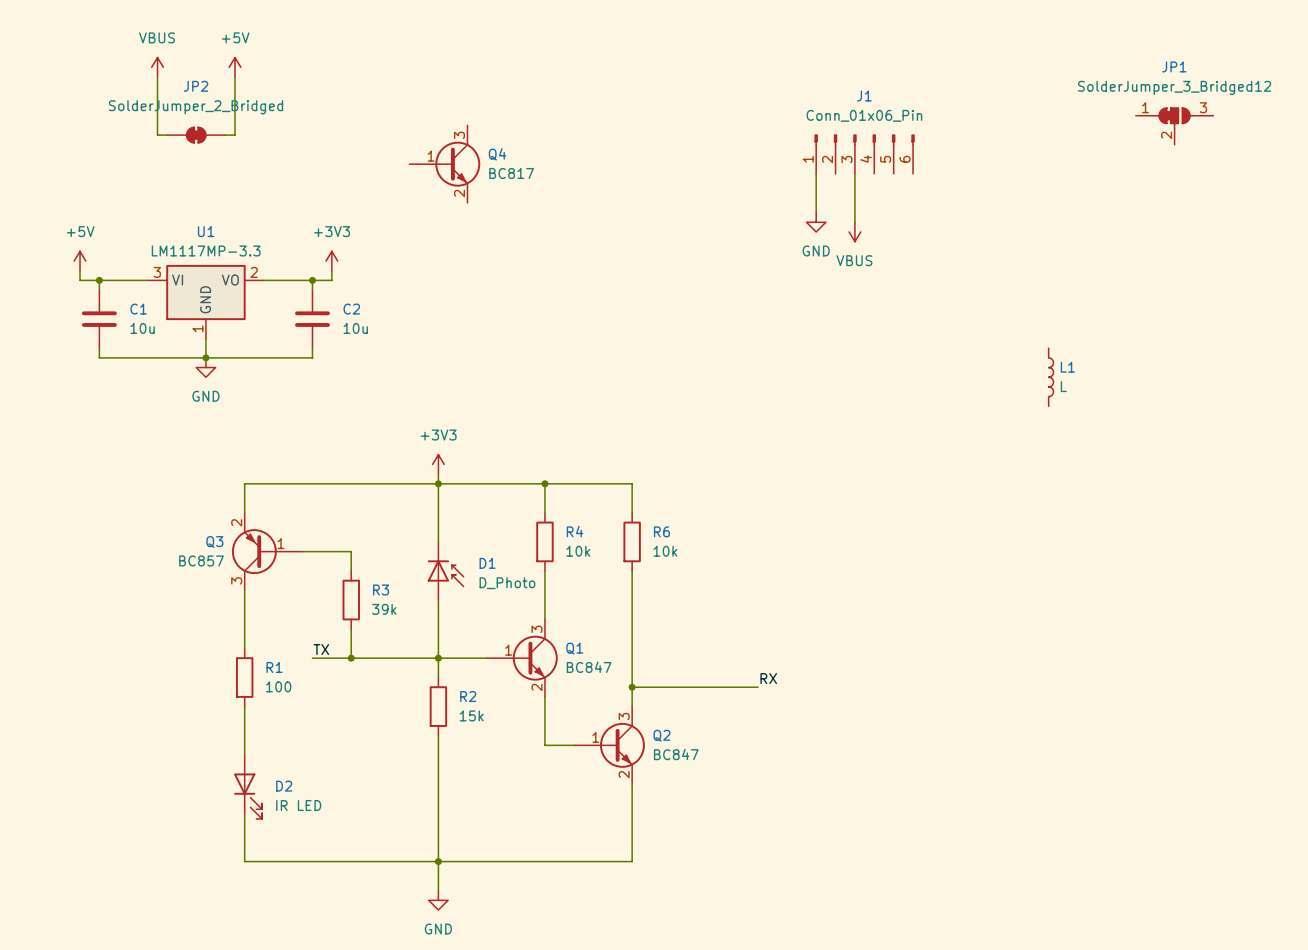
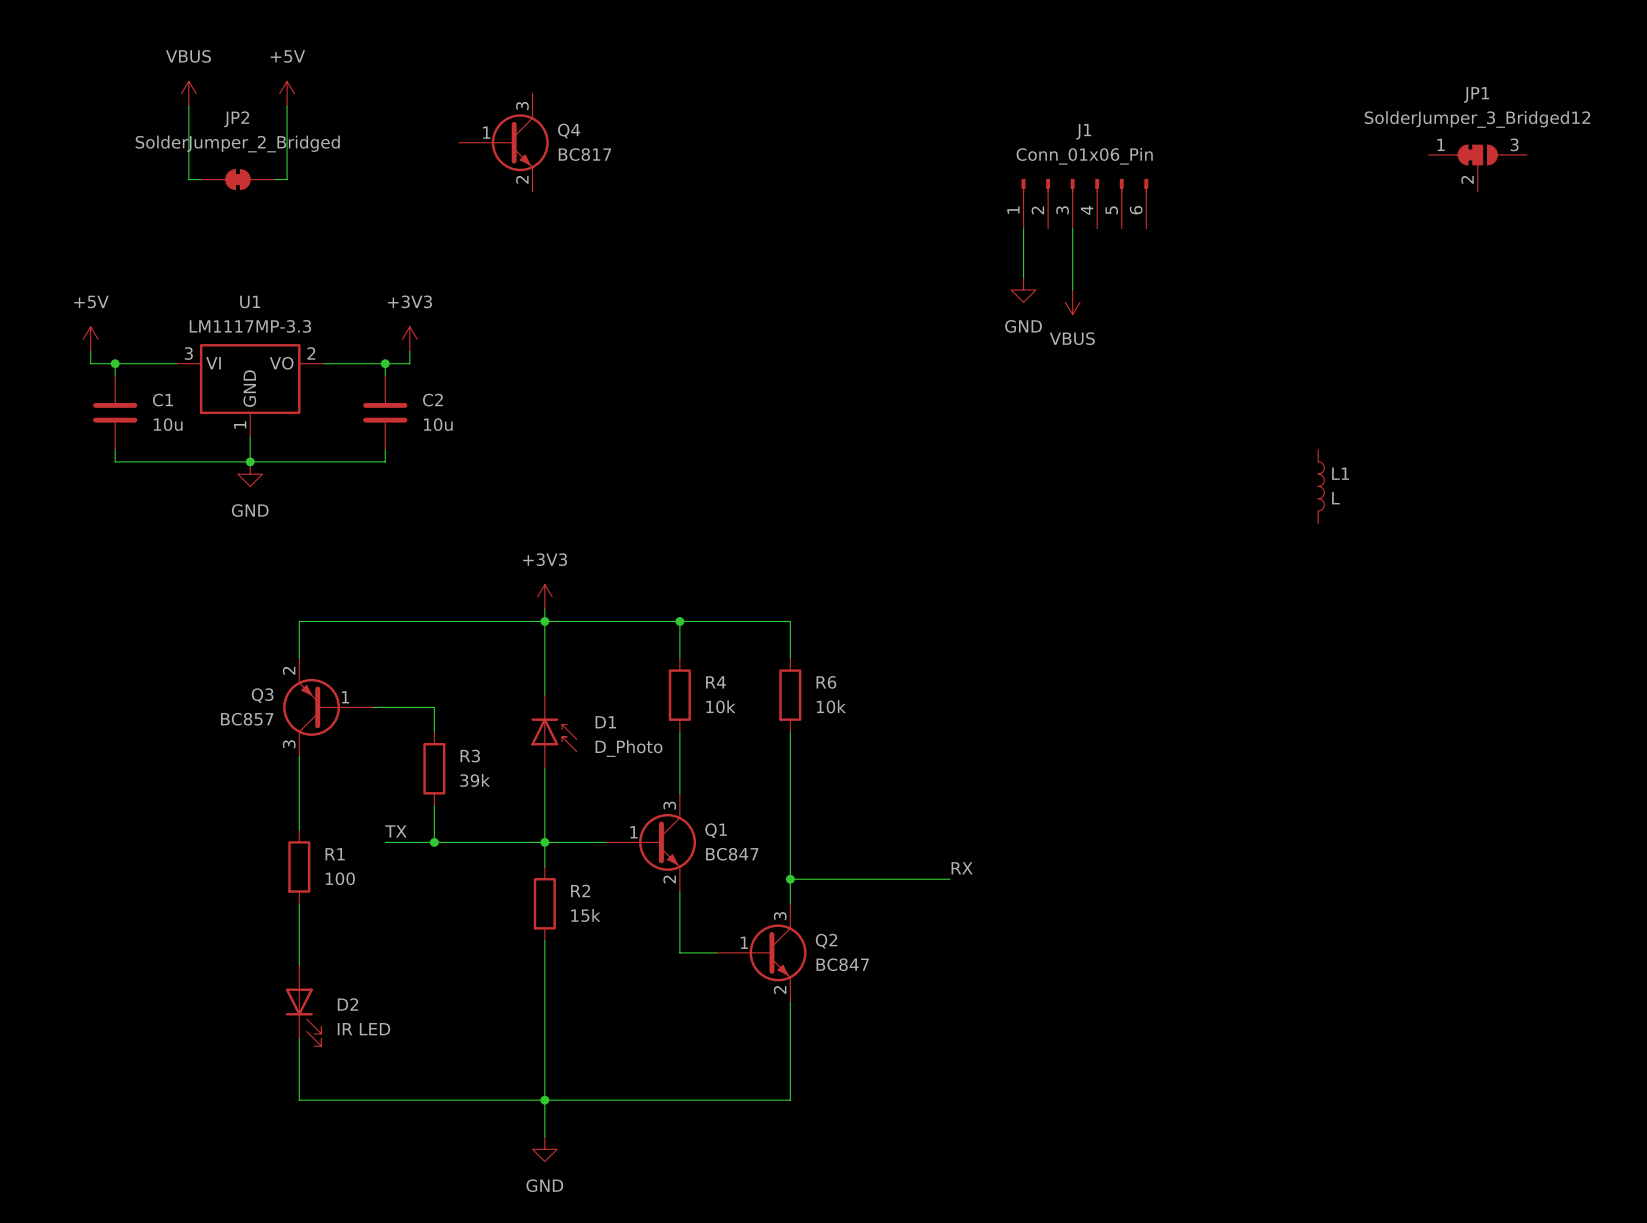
Q4 position: (444, 164) -> (503, 142)

